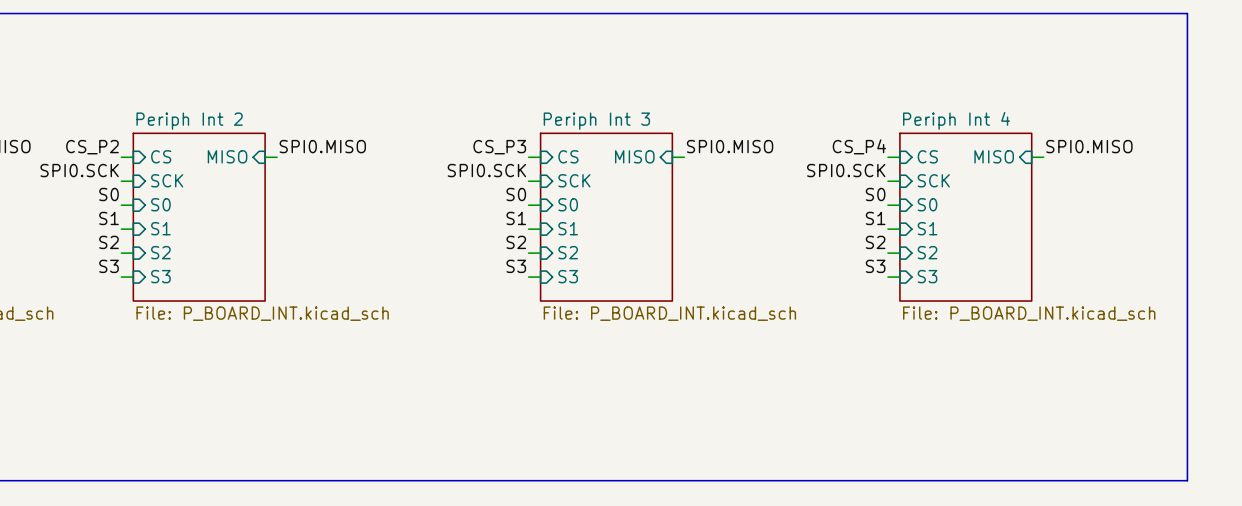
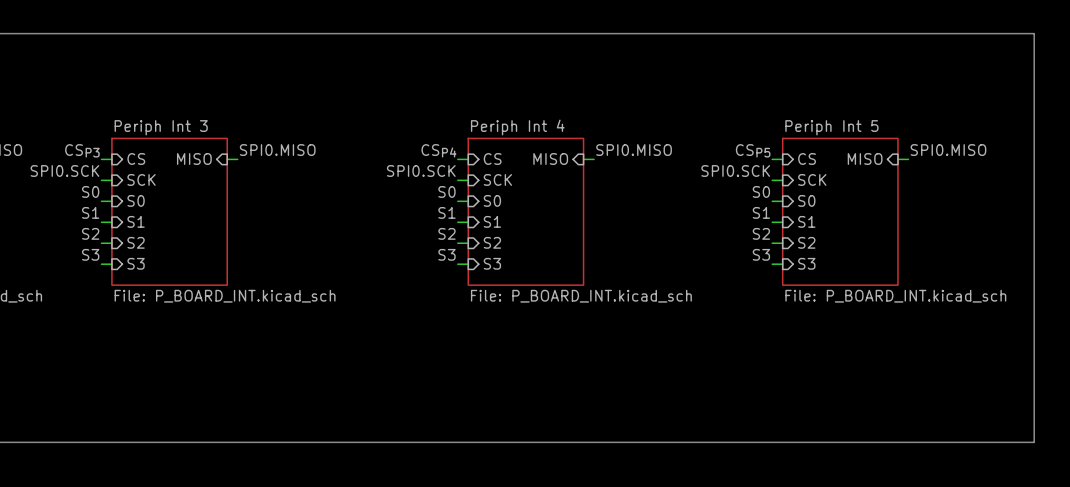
sheet Periph Int 4 name: Periph Int 4 (956, 120) -> Periph Int 5 (831, 127)
sheet Periph Int 2 name: Periph Int 2 (189, 121) -> Periph Int 3 (161, 127)
sheet Periph Int 3 name: Periph Int 3 (596, 121) -> Periph Int 4 (517, 127)
label: CS_P4 (859, 146) -> CSP5 (753, 150)
label: CS_P2 (92, 147) -> CSP3 (82, 150)
label: CS_P3 (499, 147) -> CSP4 (438, 150)

